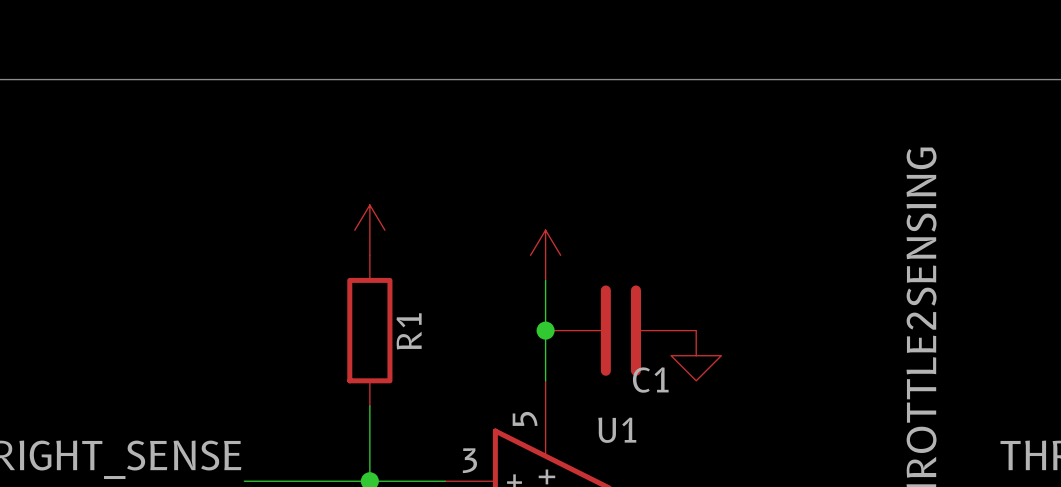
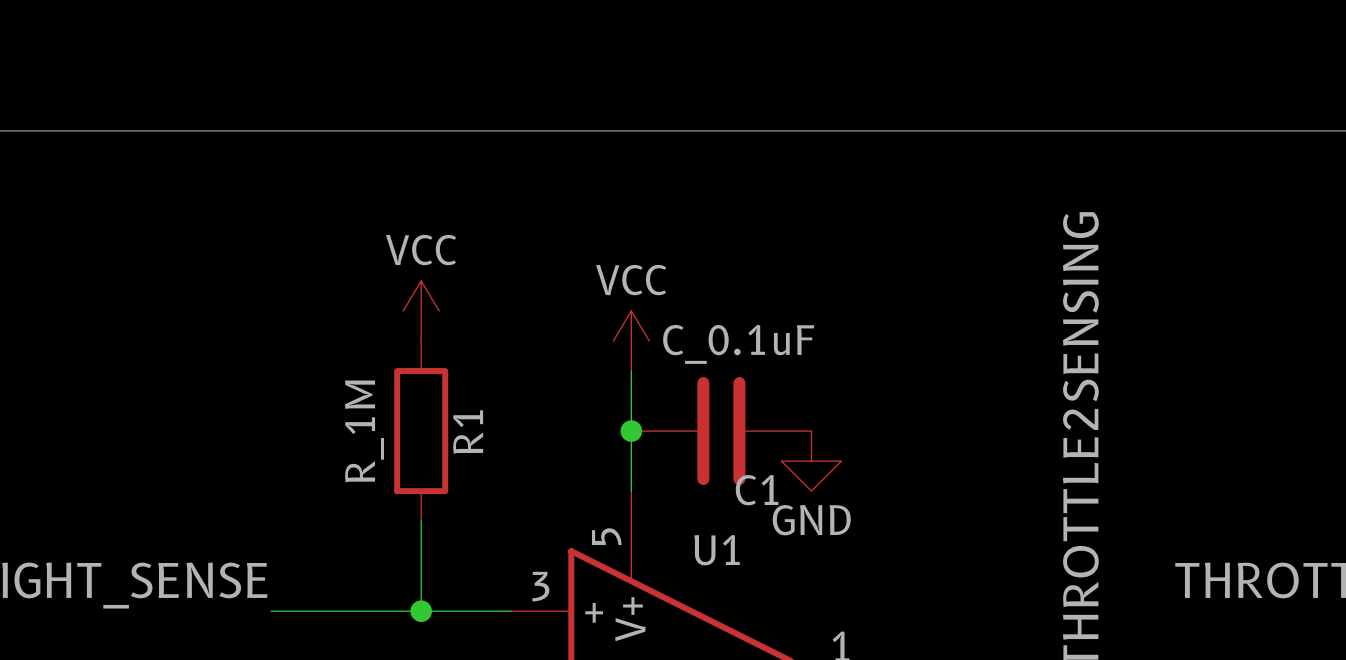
power symbol text: none -> VCC (421, 250)
power symbol text: none -> VCC (631, 280)
C1 value: none -> C_0.1uF (738, 344)
R1 value: none -> R_1M (364, 431)
power symbol text: none -> GND (811, 520)

